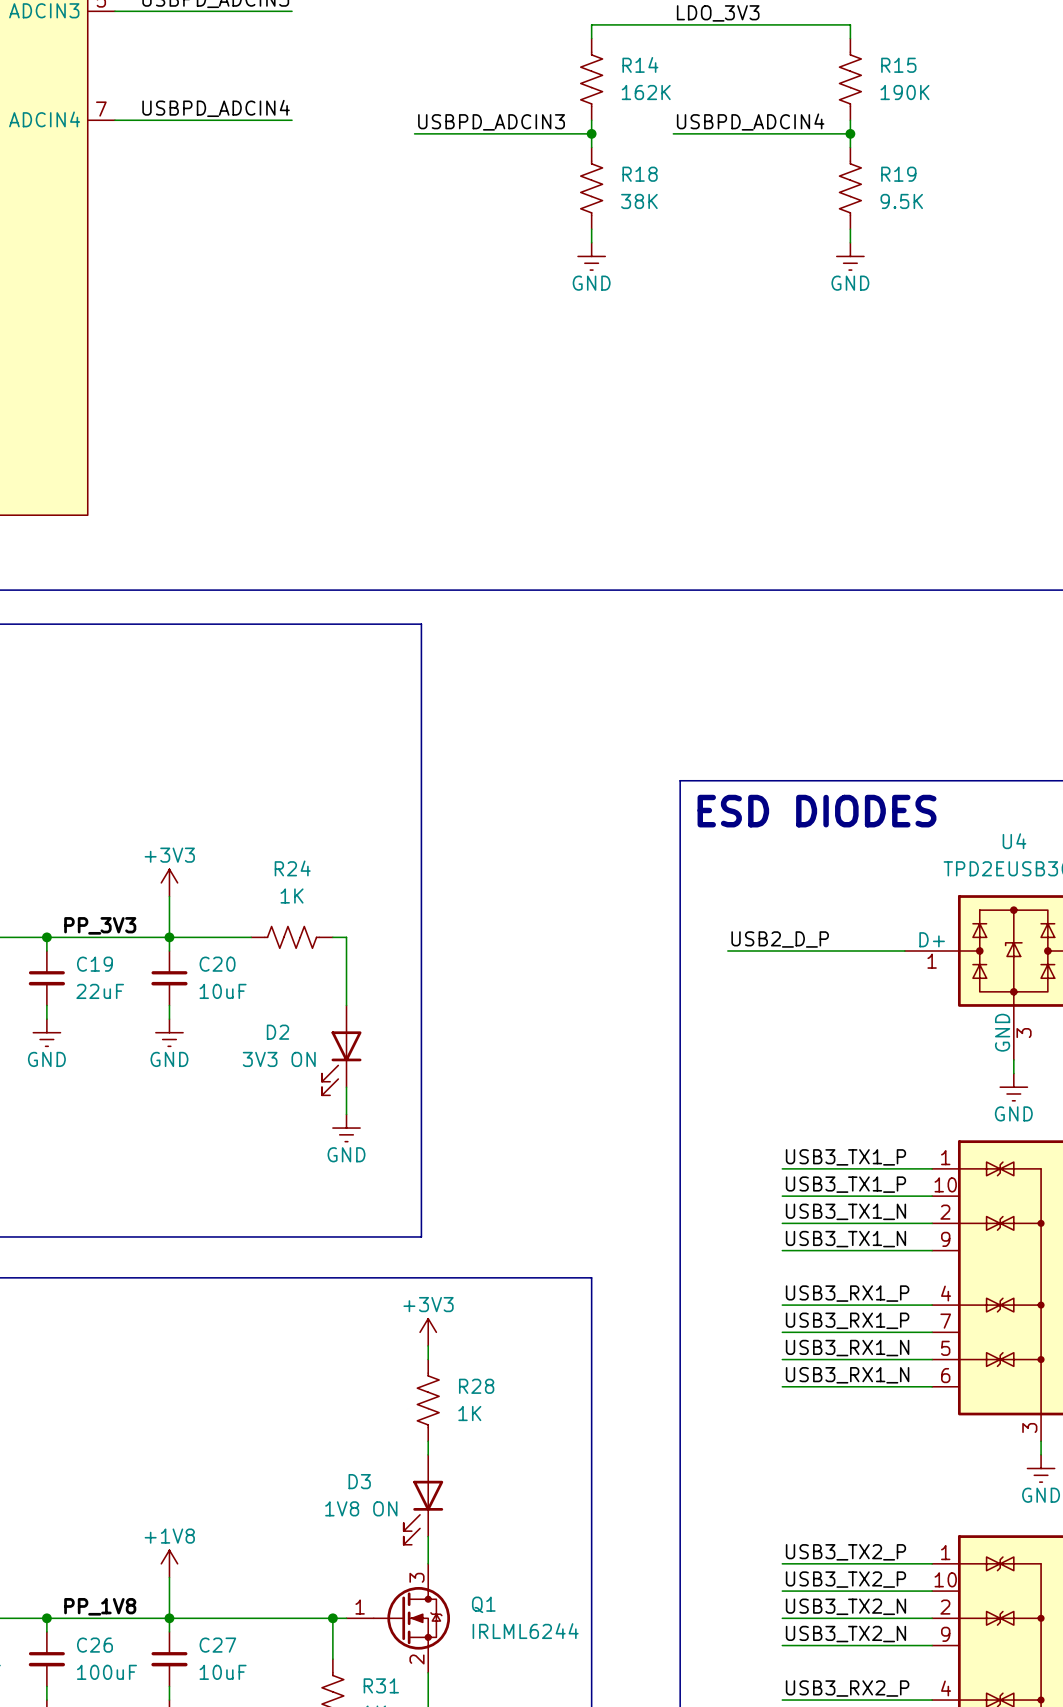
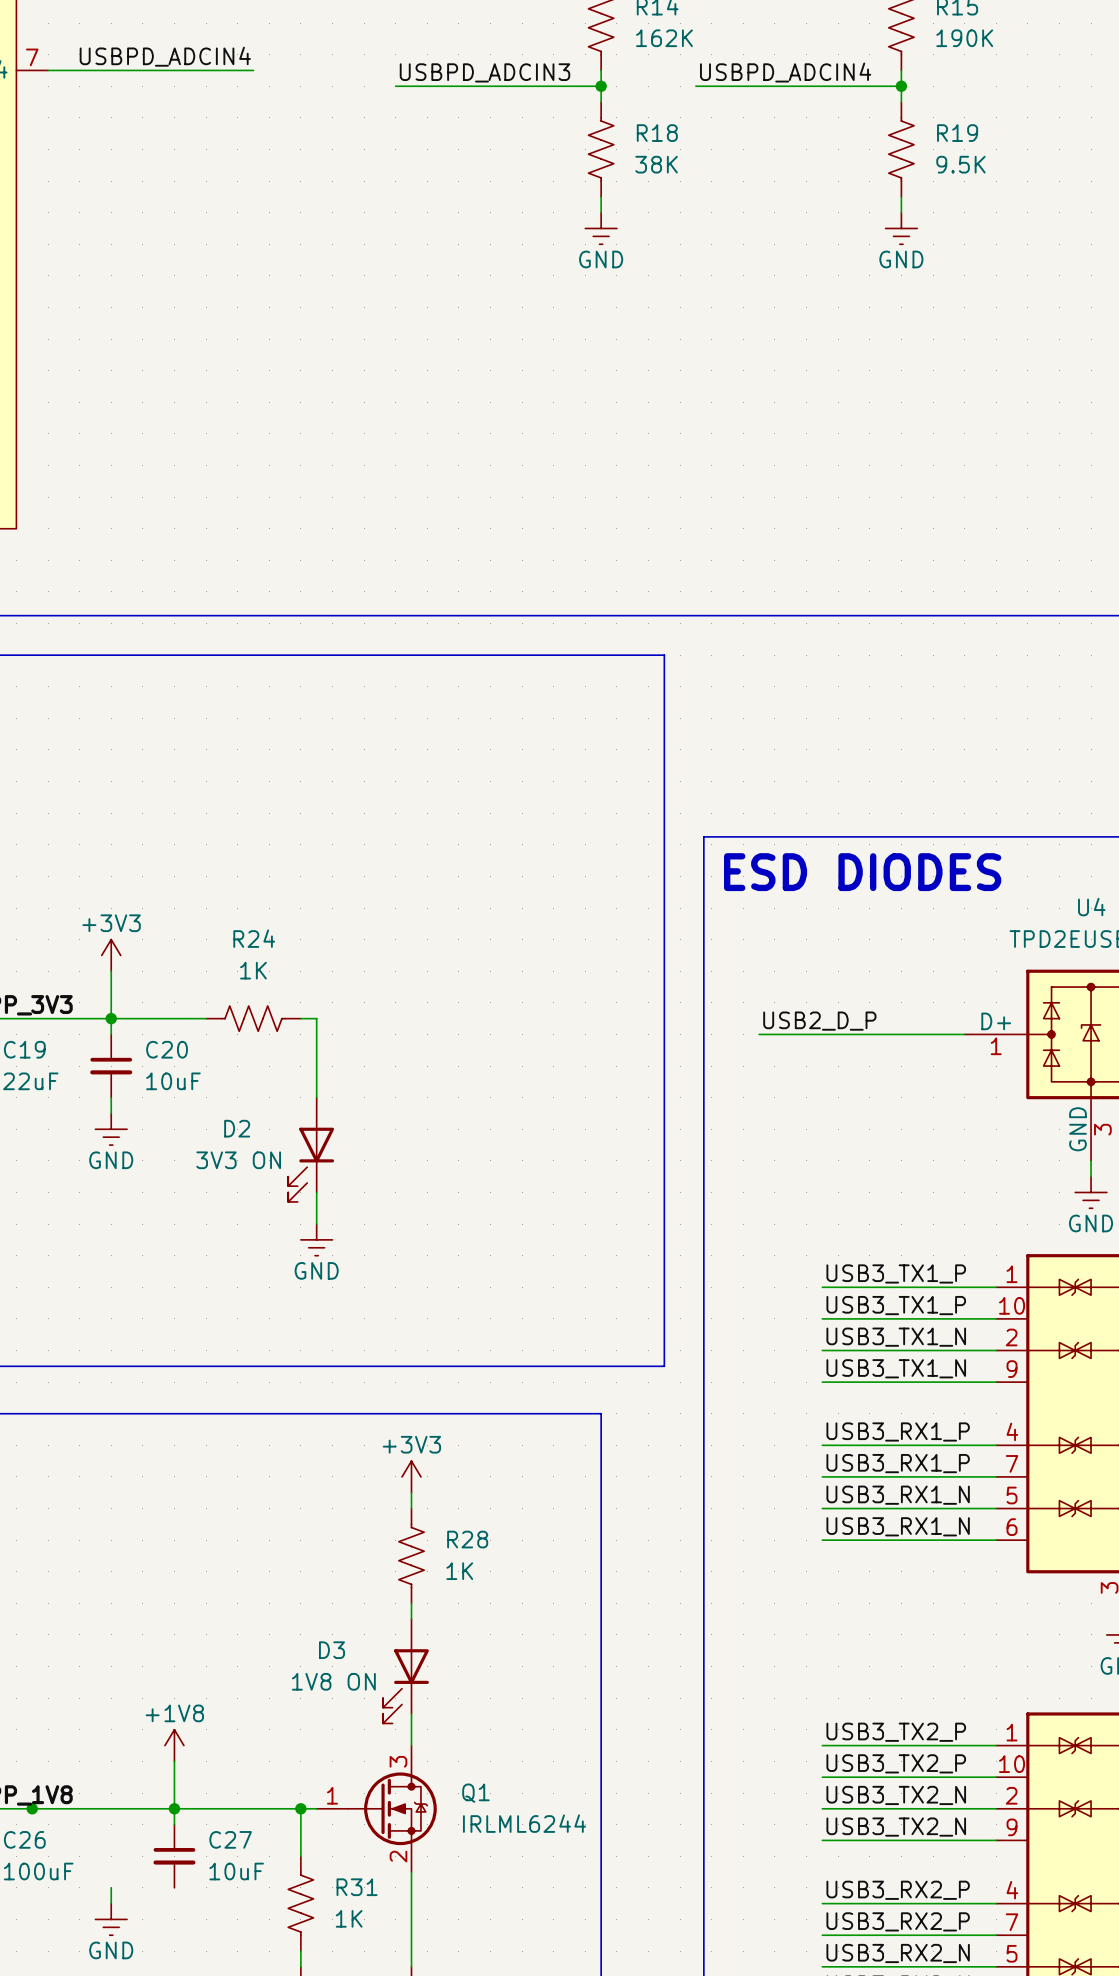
line: (421, 624) (421, 1236) -> (403, 655) (664, 655) (664, 1366) (403, 1366)
power symbol position: +1V8 (169, 1563) -> +1V8 (174, 1745)
wire: (169, 1577) (169, 1631) -> (174, 1761) (174, 1824)
junction: none -> (32, 1808)
junction: (169, 1618) -> none
junction: none -> (174, 1808)
C27 position: (169, 1659) -> (174, 1856)

